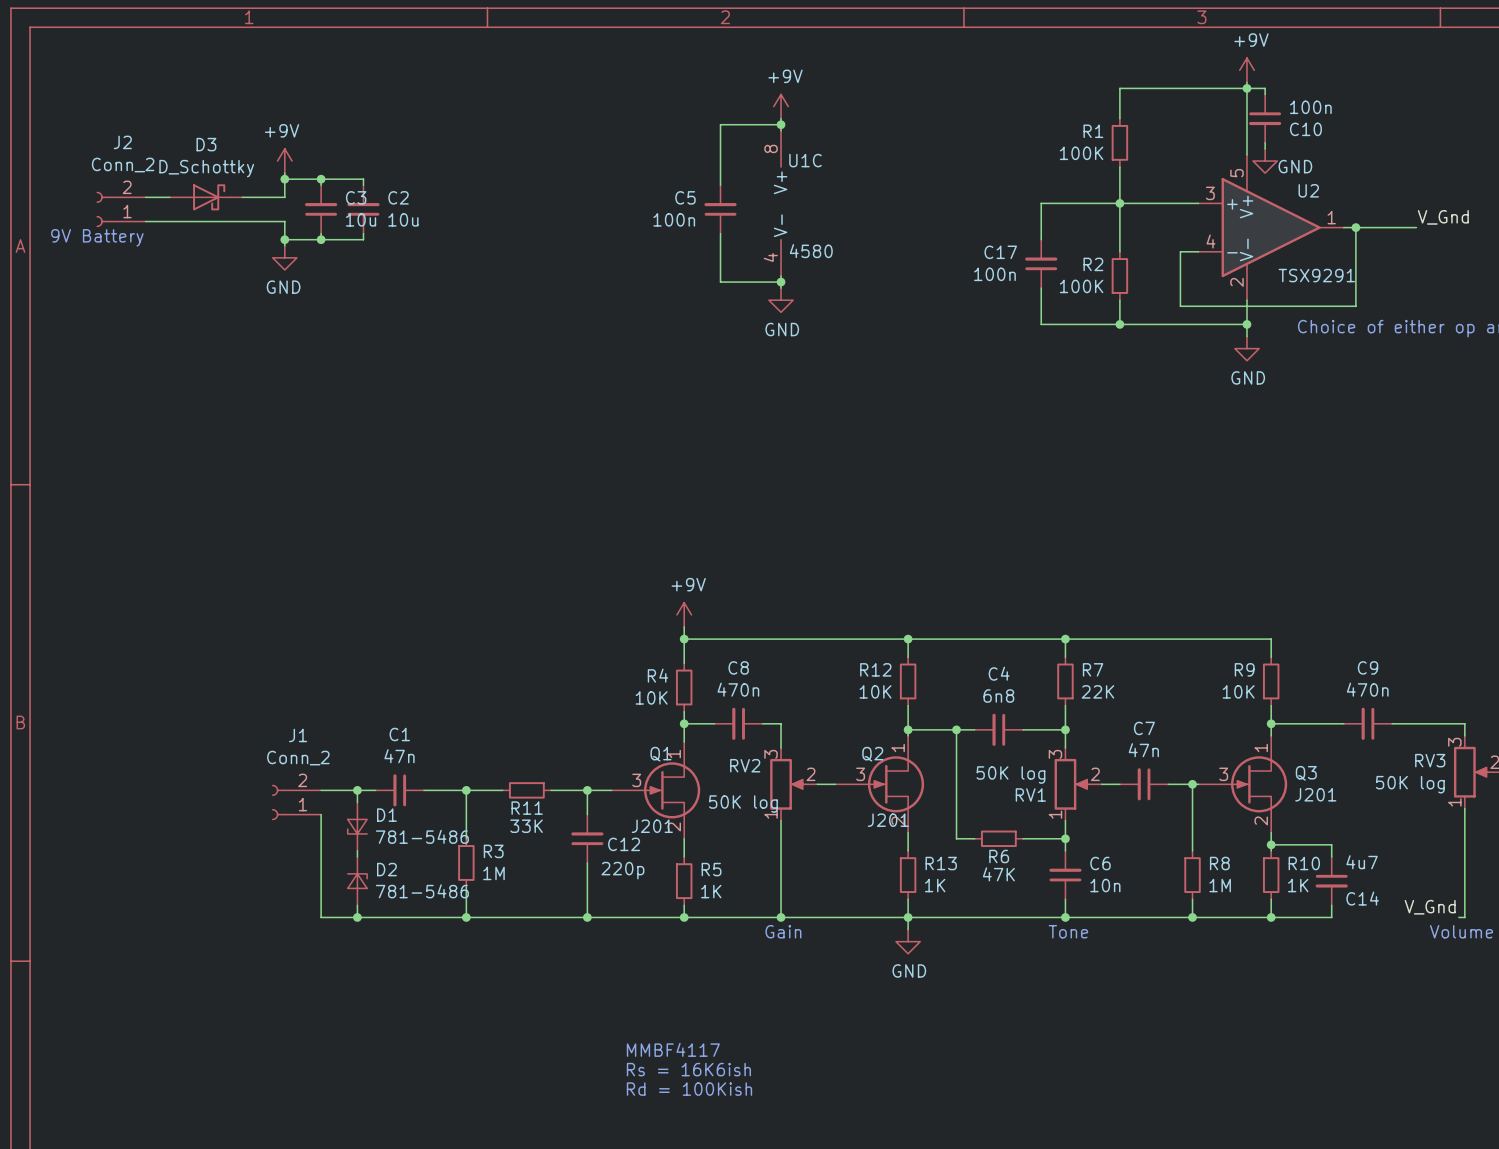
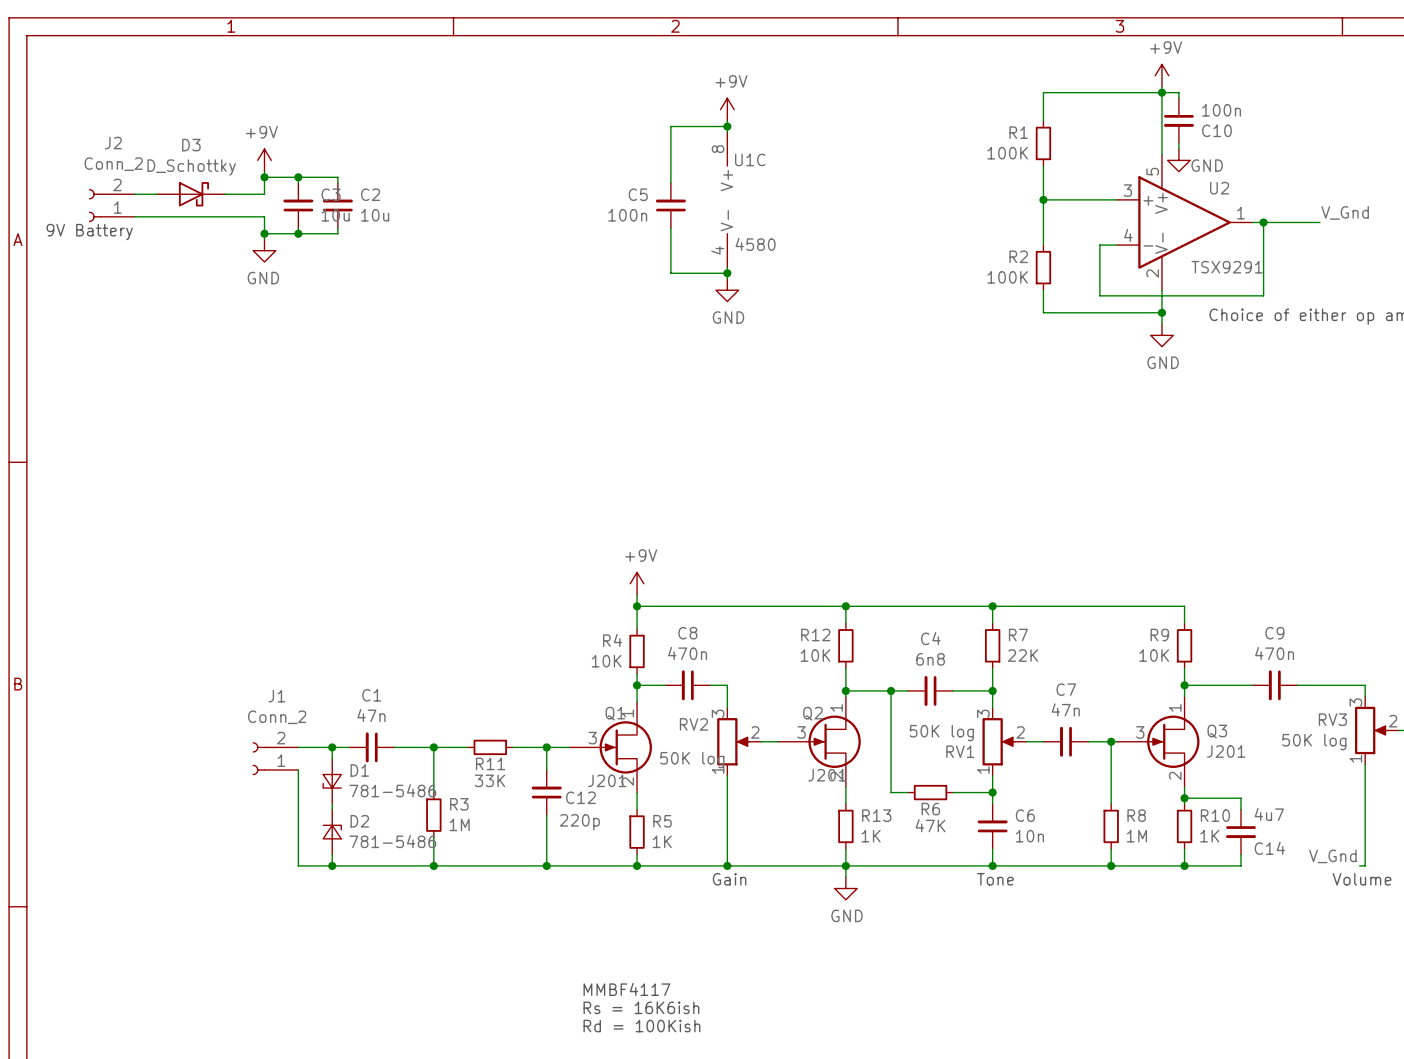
wire: (1119, 203) (1041, 203) (1041, 239) -> none
C17: 100n (1041, 263) -> none
wire: (1041, 288) (1041, 324) (1119, 324) -> none
junction: (1119, 324) -> none

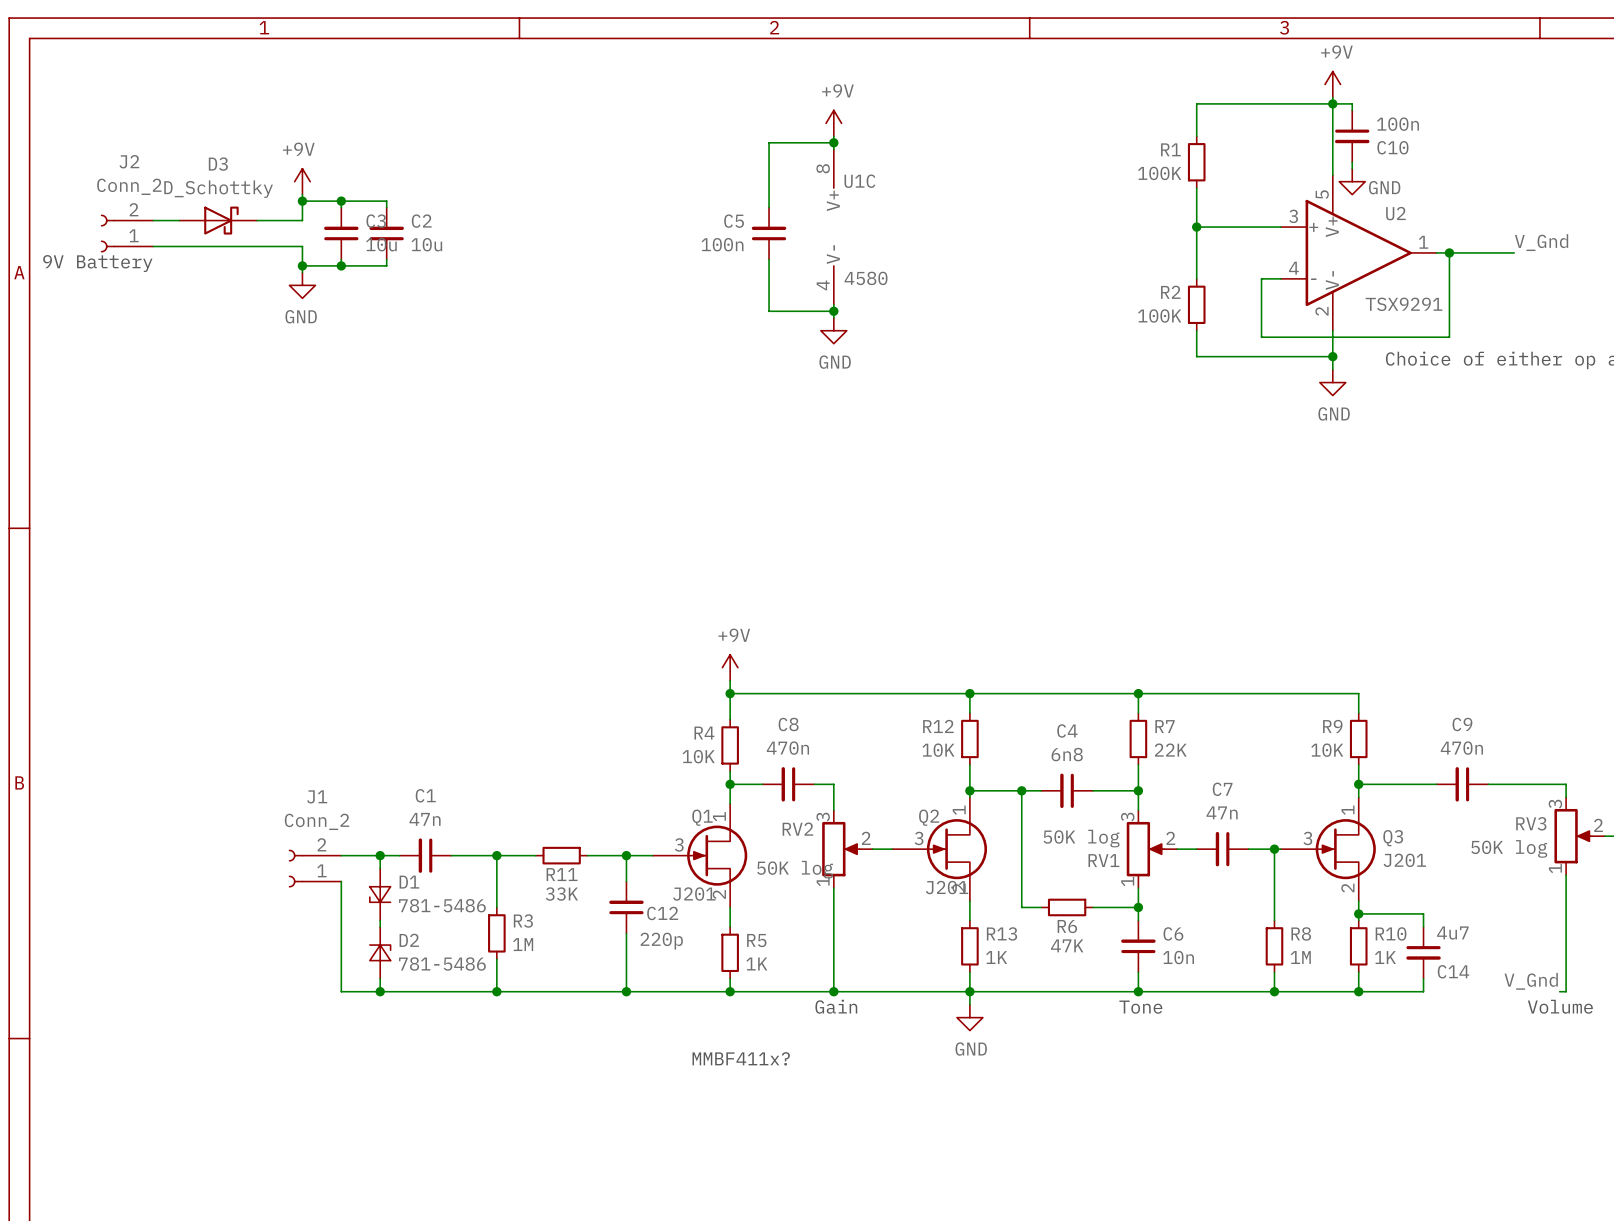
text: none -> MMBF411x? (741, 1058)
text: MMBF4117 (626, 989) -> none
text: Rs = 16K6ish (641, 1007) -> none
text: Rd = 100Kish (641, 1026) -> none

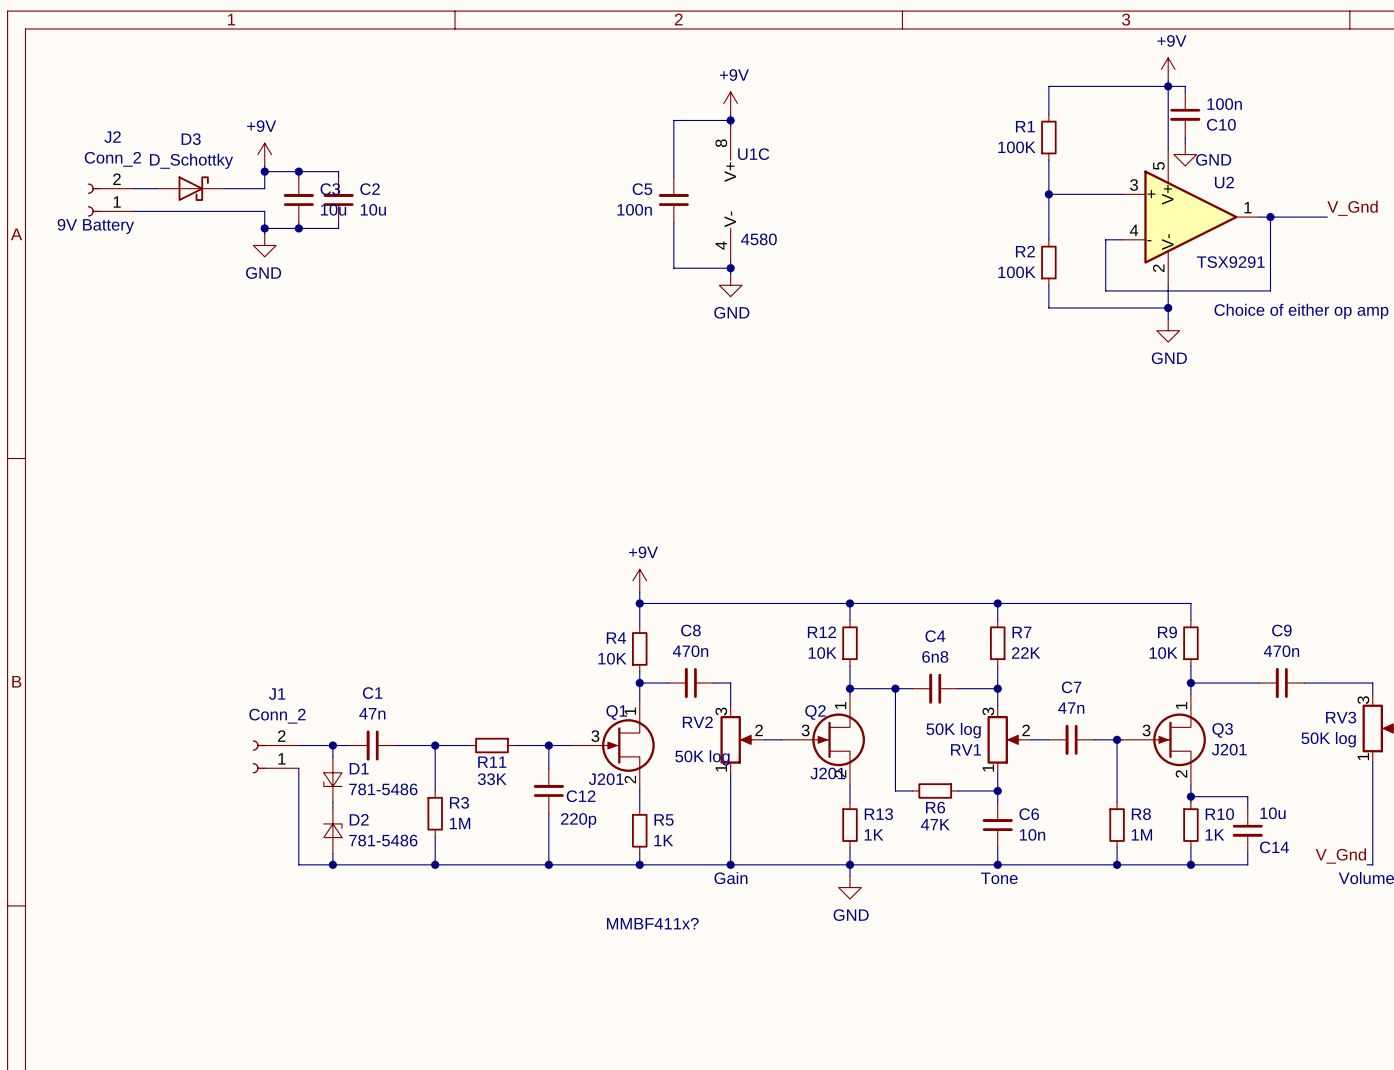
C14 value: 4u7 (1452, 933) -> 10u (1272, 813)

